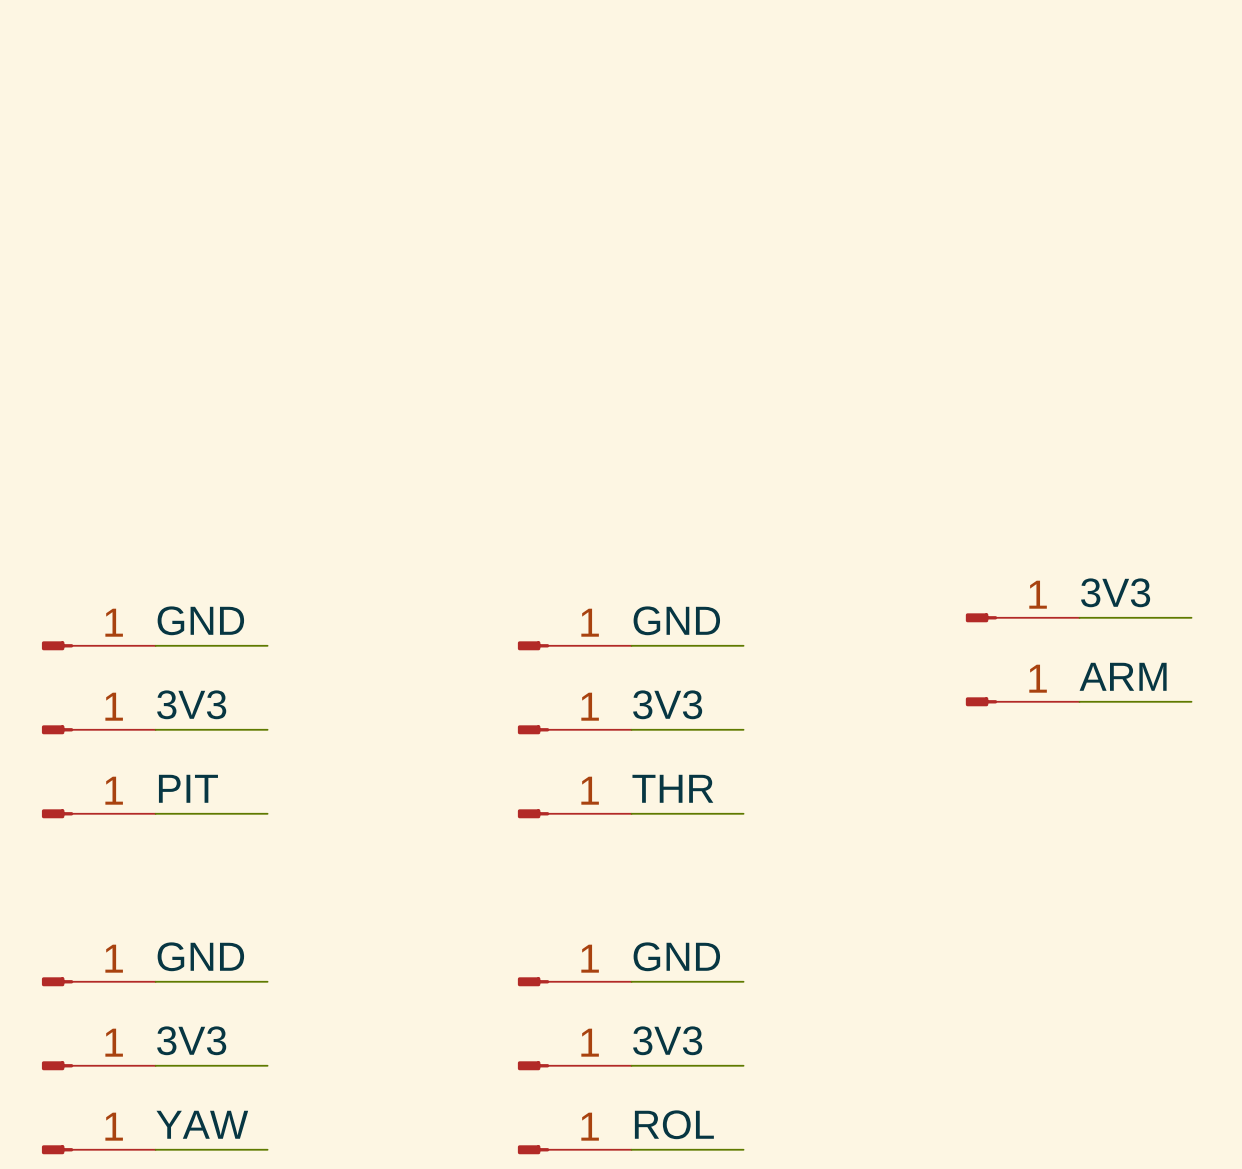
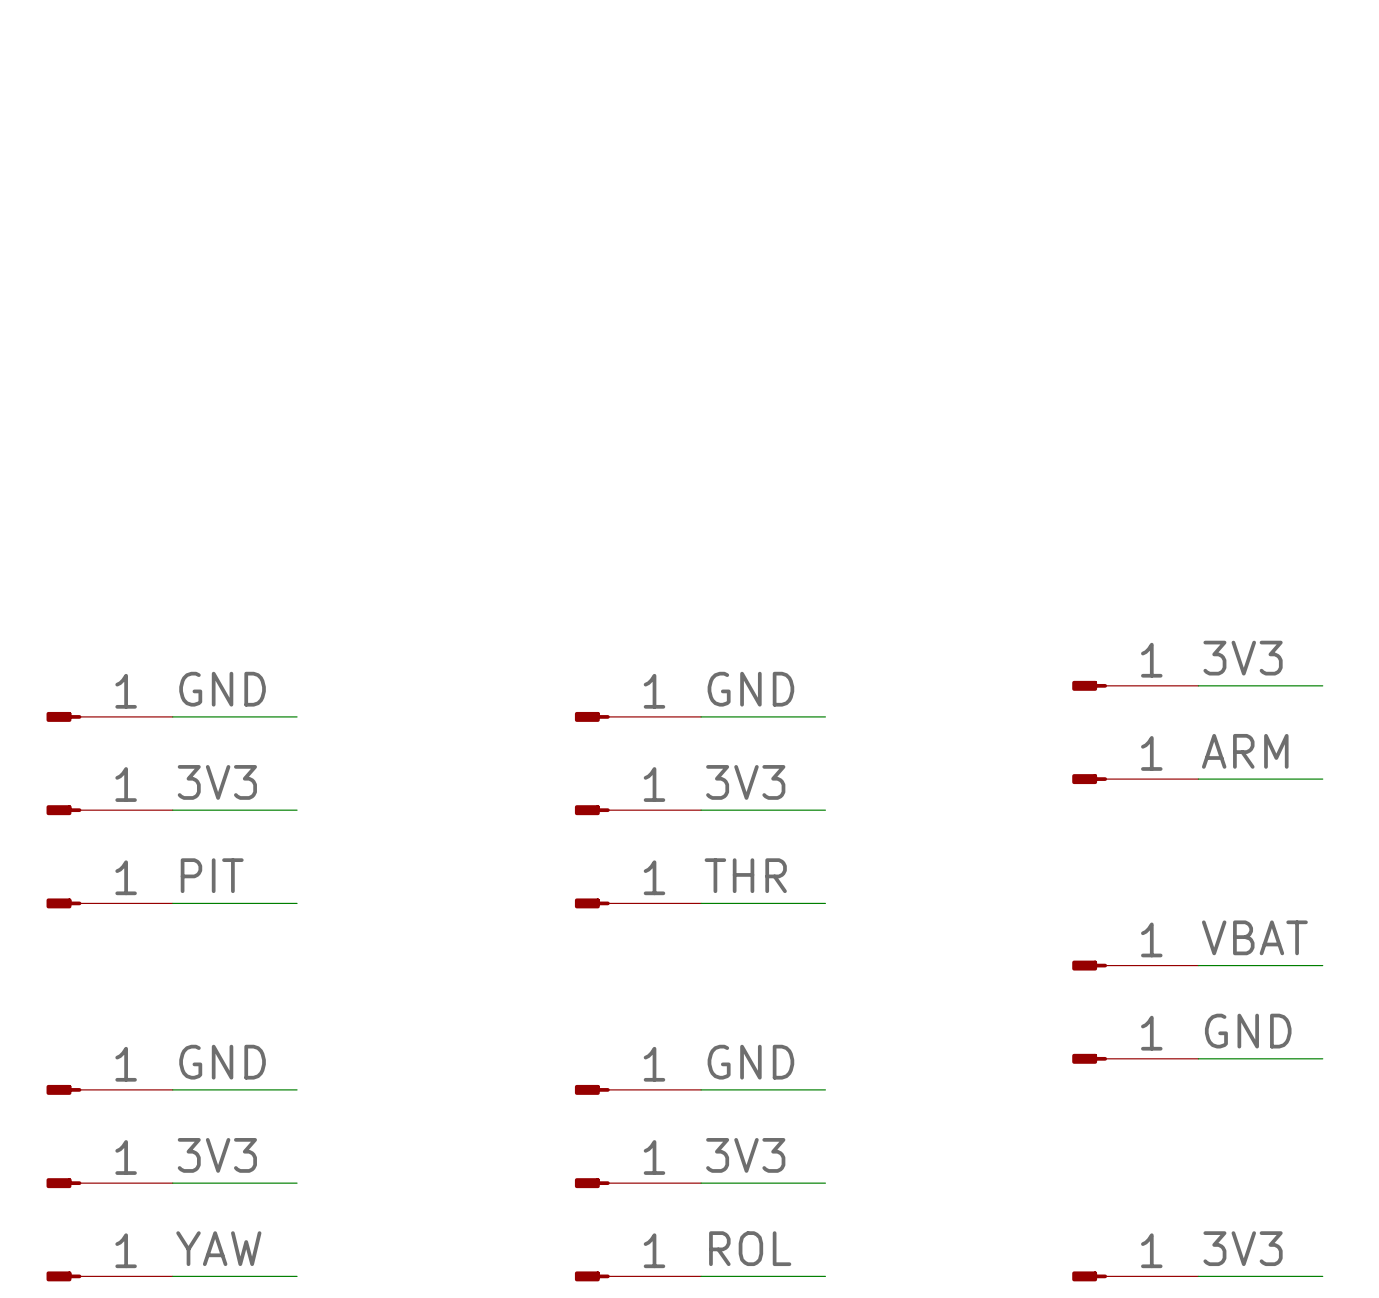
label: none -> VBAT (1254, 937)
part: none -> (1135, 965)
wire: none -> (1198, 965) (1322, 965)
label: none -> GND (1248, 1031)
part: none -> (1135, 1058)
wire: none -> (1198, 1058) (1322, 1058)
label: none -> 3V3 (1243, 1248)
part: none -> (1135, 1276)
wire: none -> (1198, 1276) (1322, 1276)

